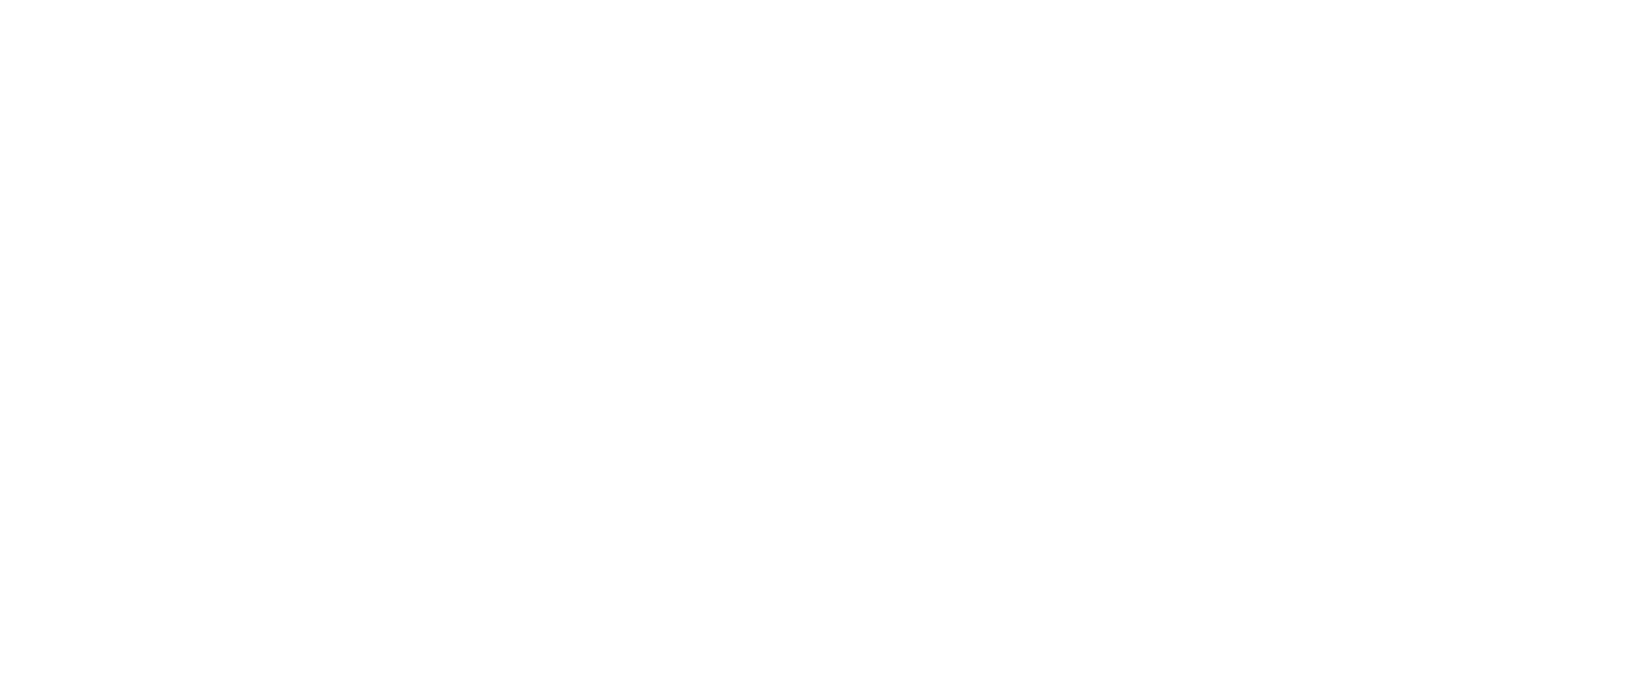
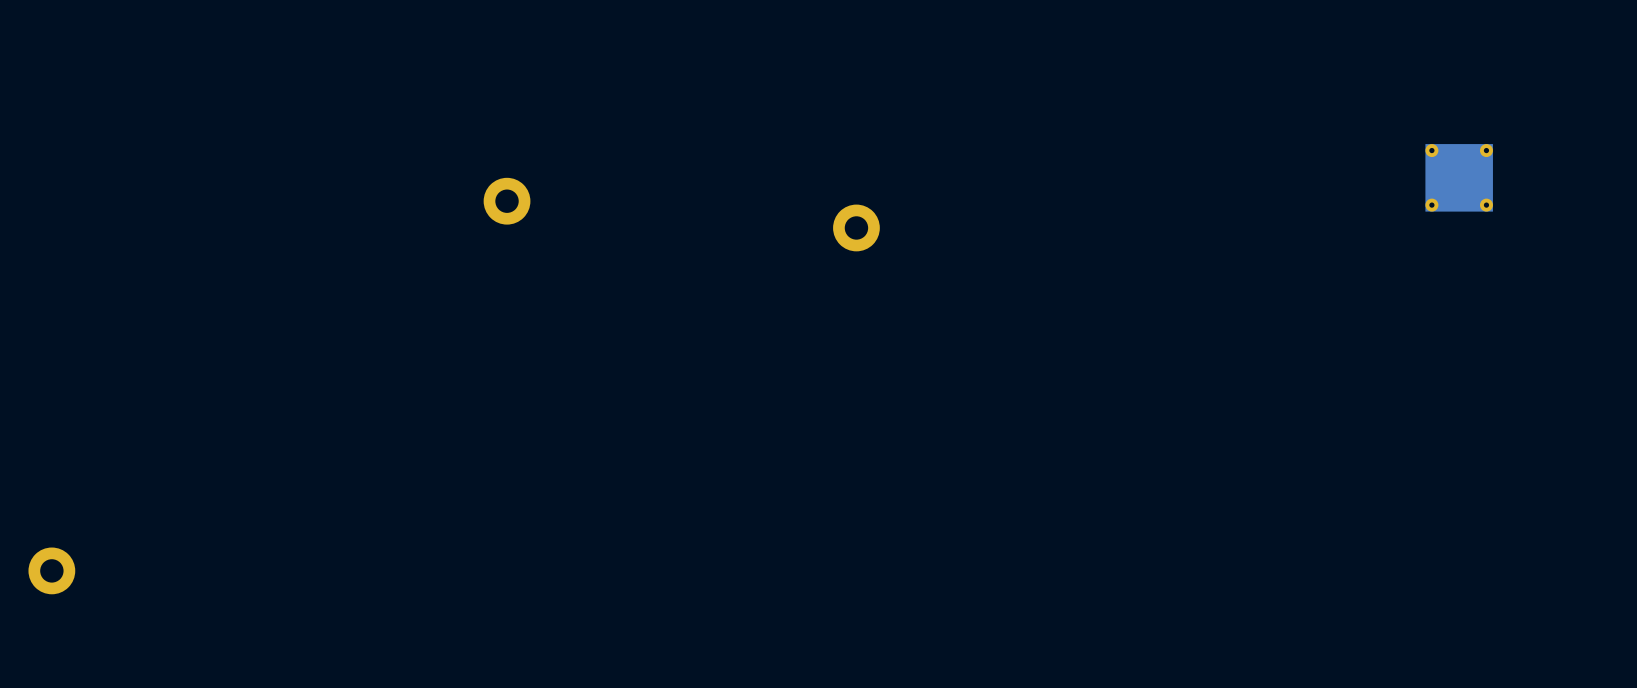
part: none -> (1459, 177)
part: none -> (507, 201)
part: none -> (856, 227)
part: none -> (51, 570)

